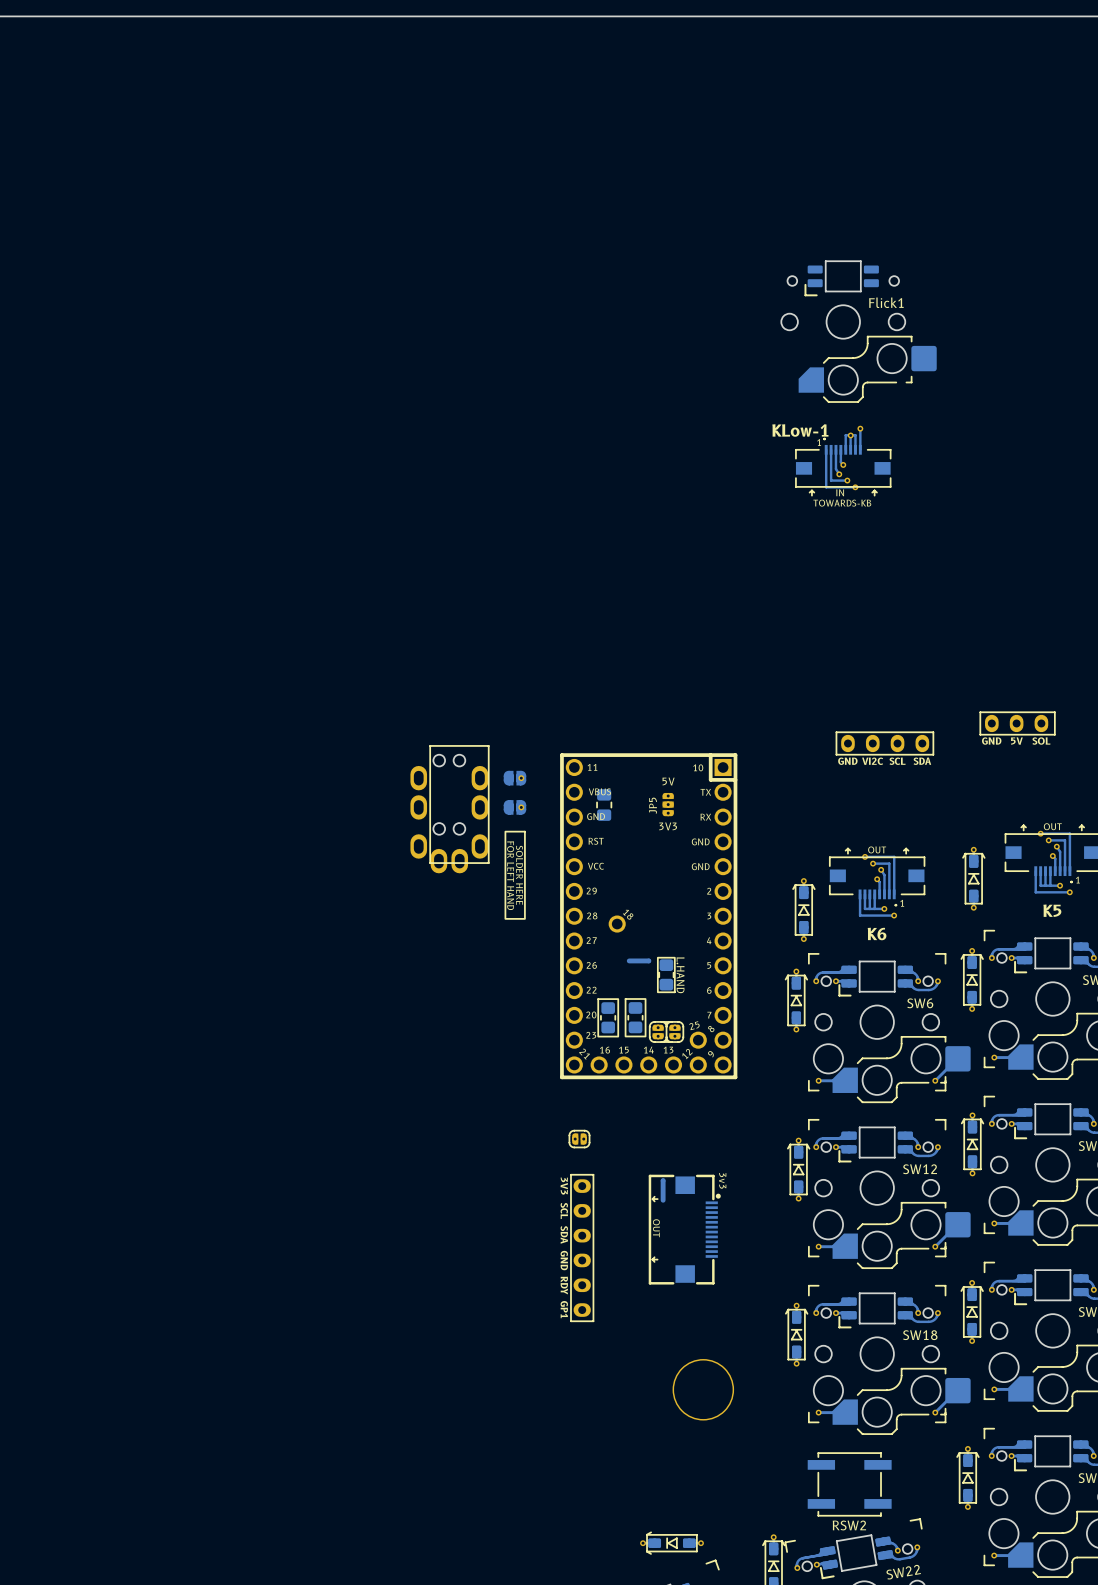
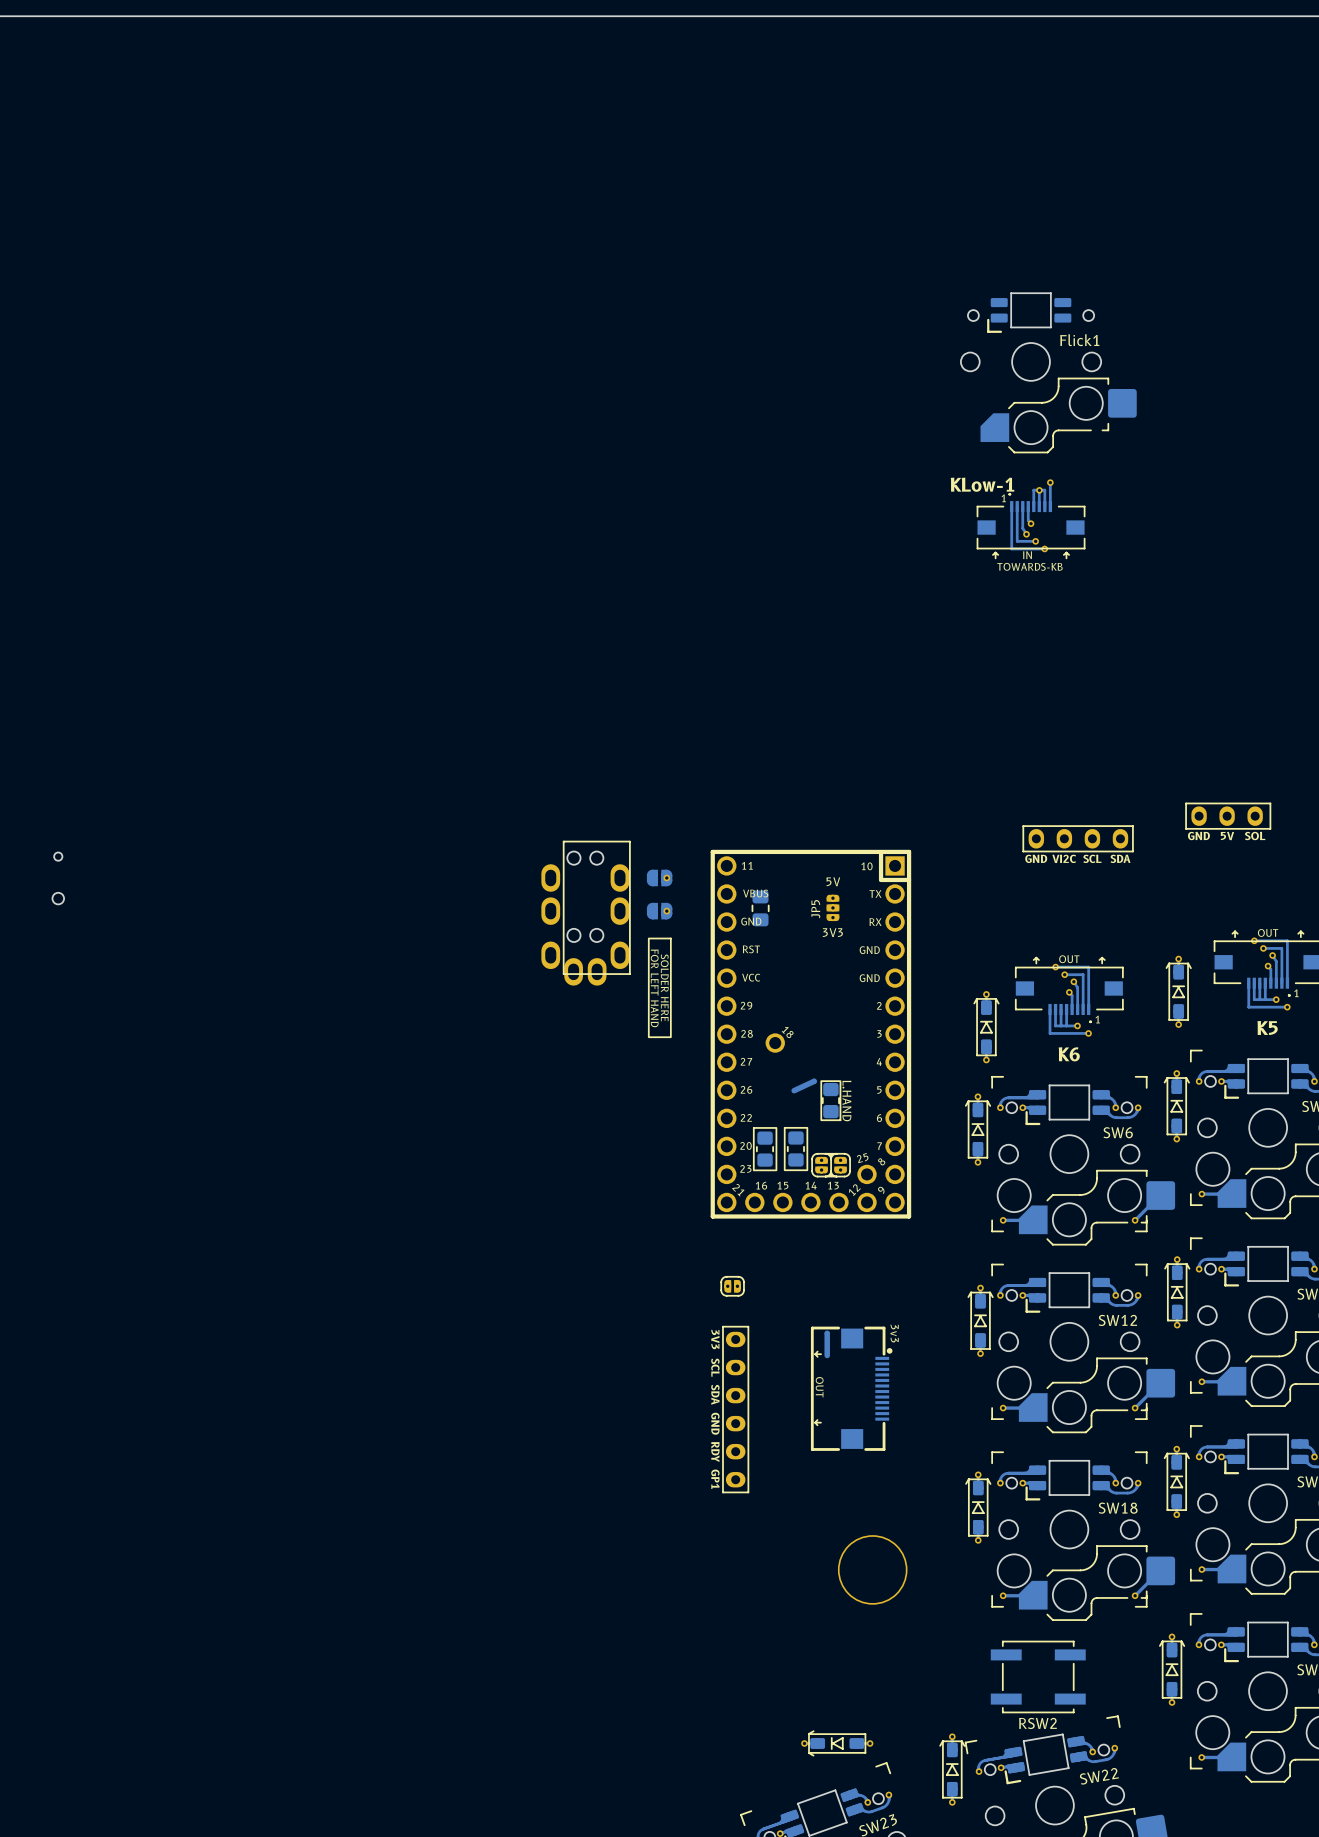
part rotation: 0° (639, 960) -> 25° counterclockwise (804, 1086)

